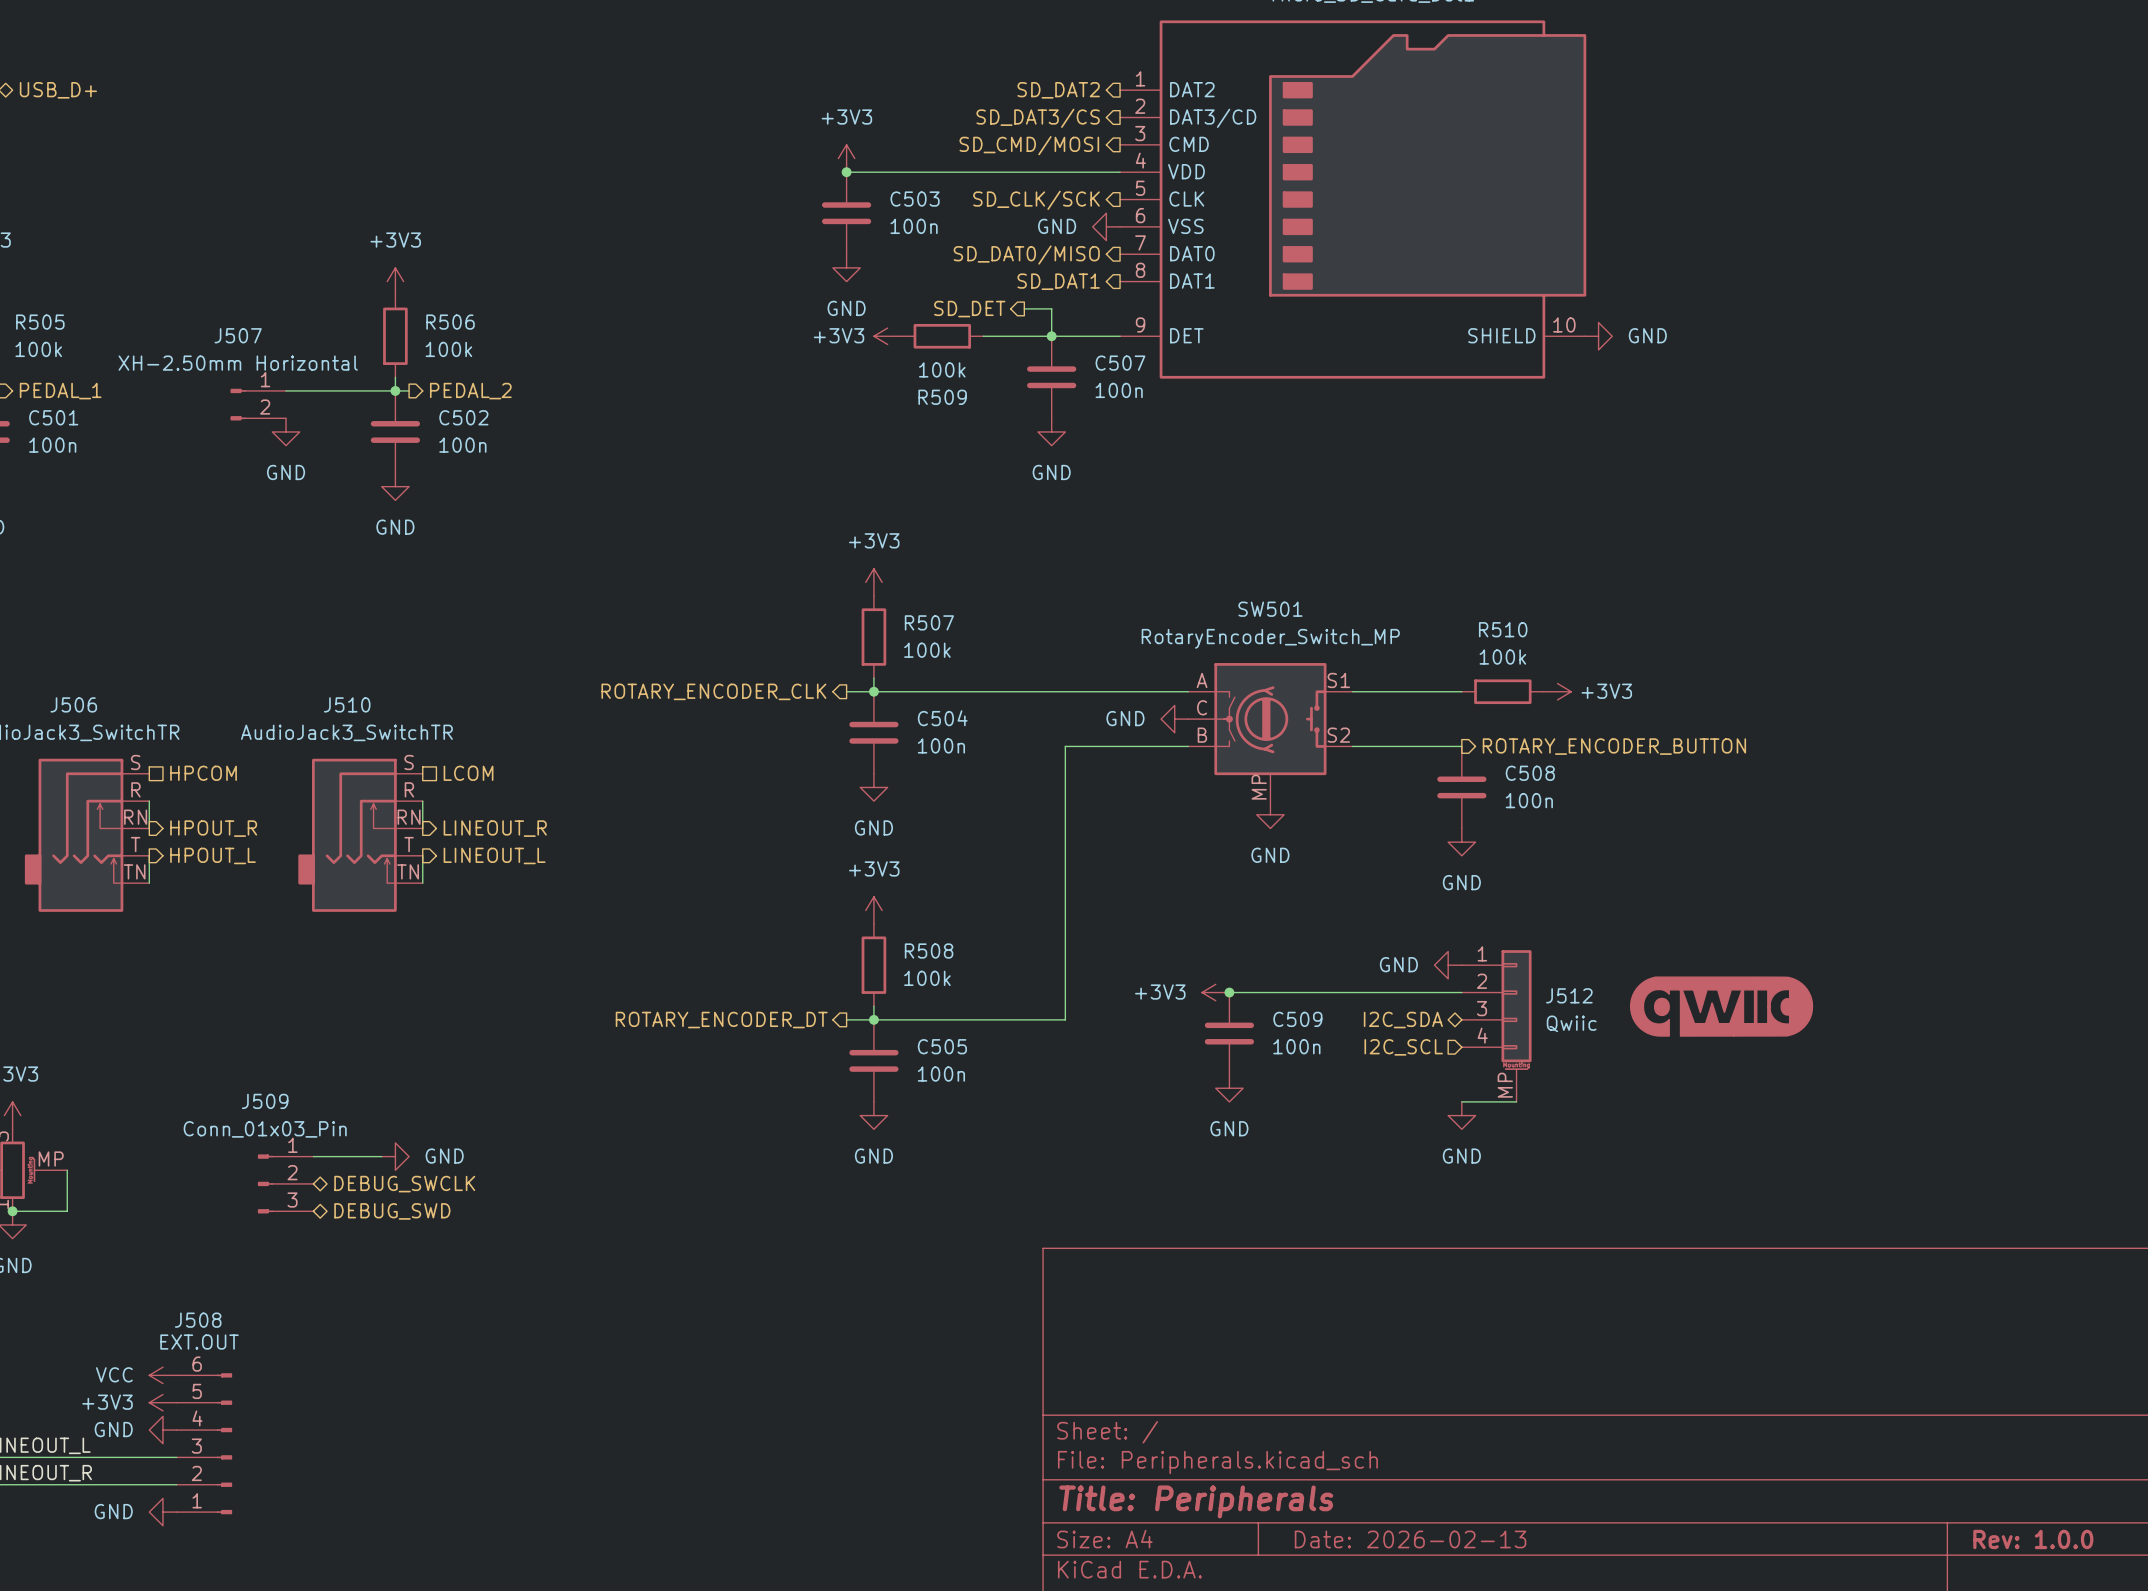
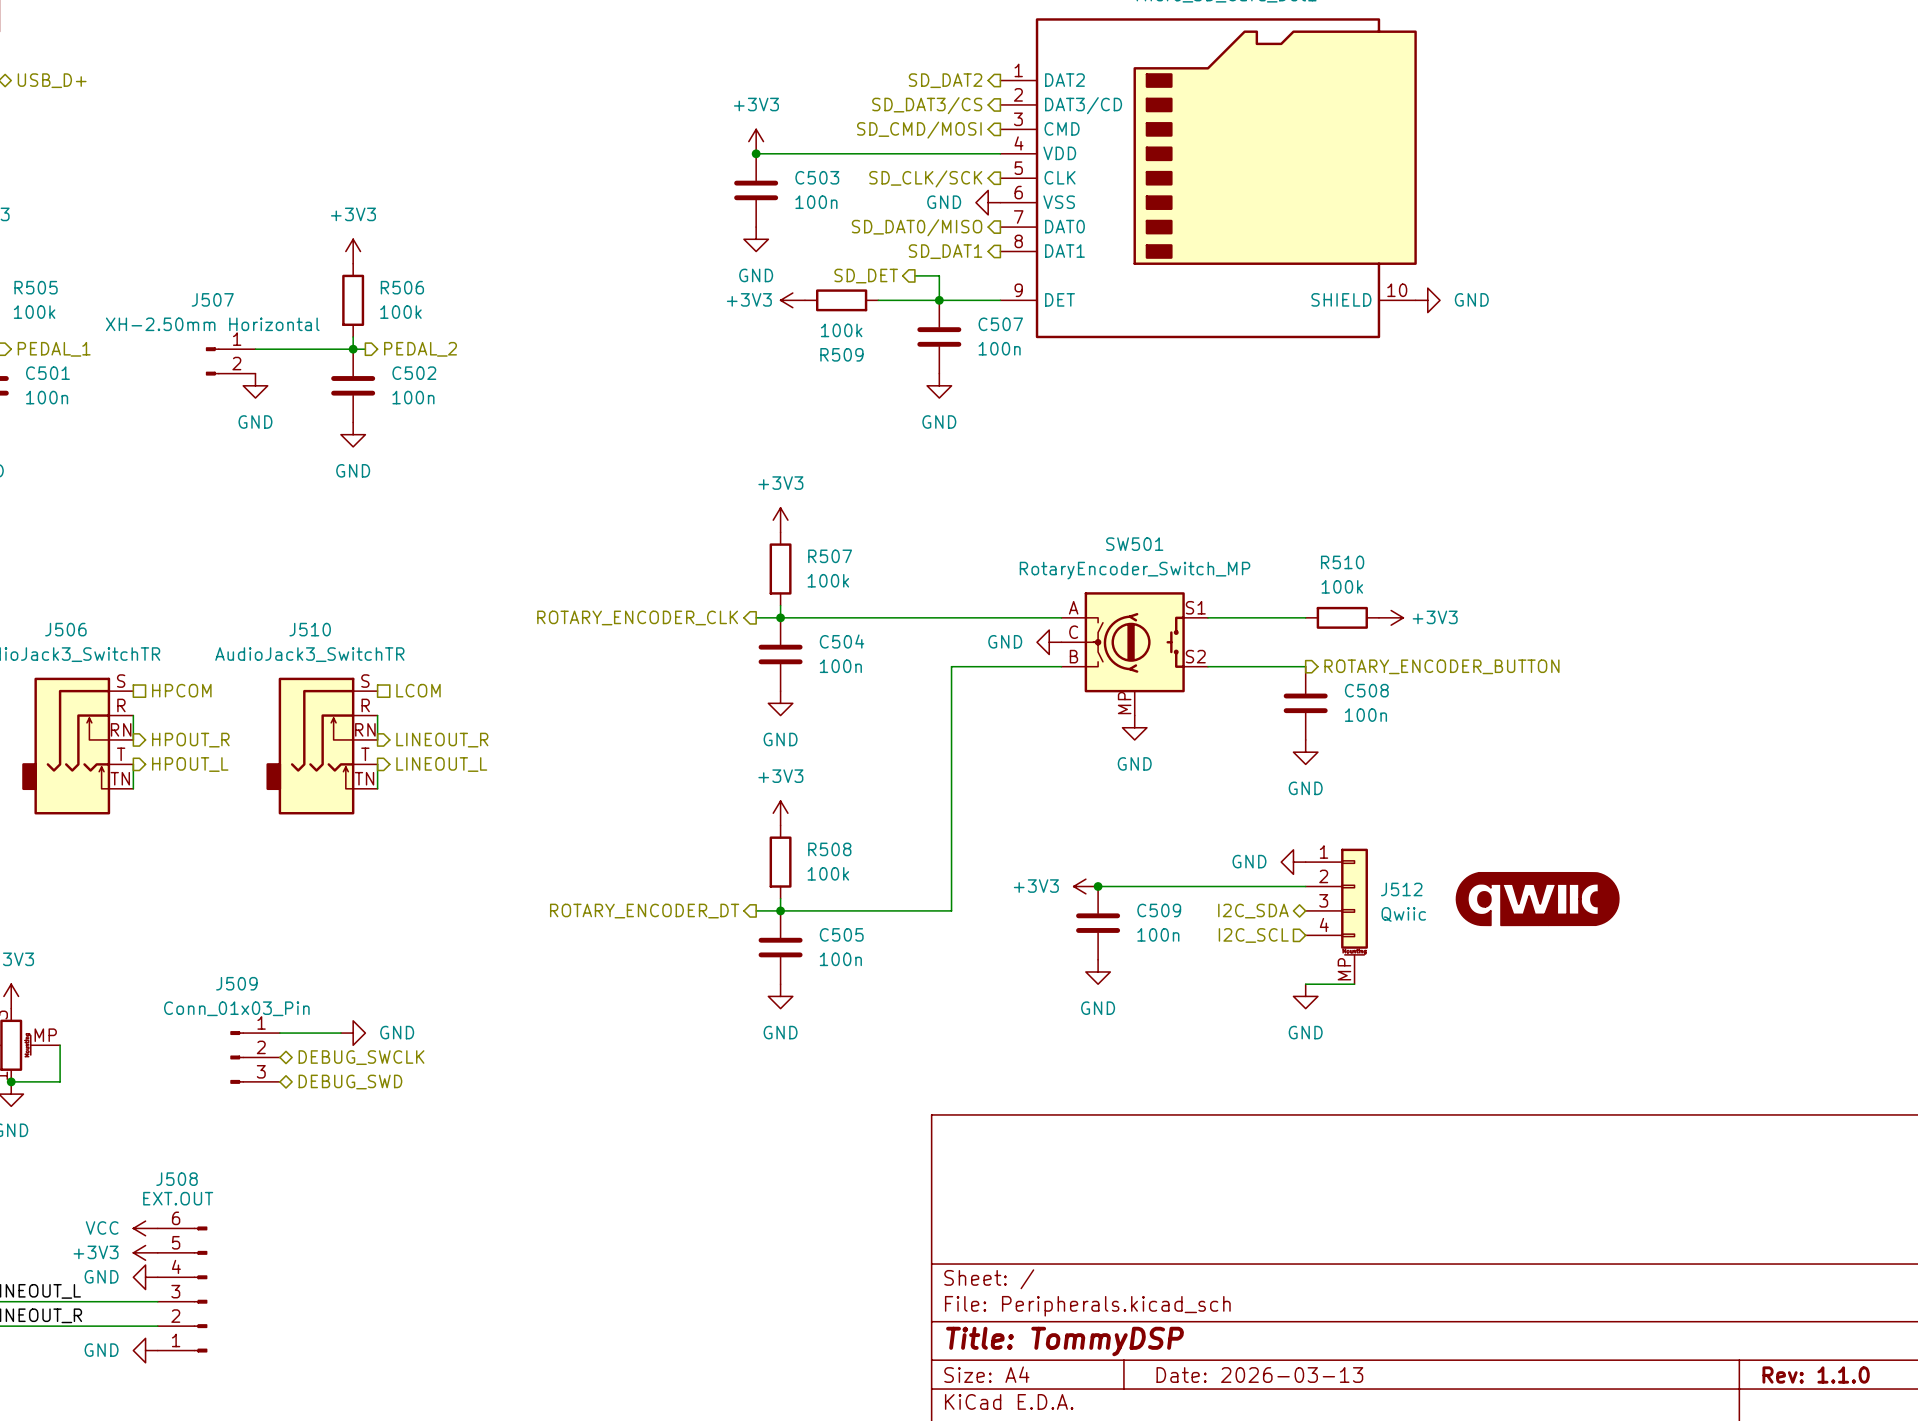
title block: Title: Peripherals (1196, 1501) -> Title: TommyDSP (1065, 1341)
title block: Date: 2026-02-13 (1410, 1539) -> Date: 2026-03-13 (1259, 1375)
title block: Rev: 1.0.0 (2033, 1539) -> Rev: 1.1.0 (1816, 1375)

